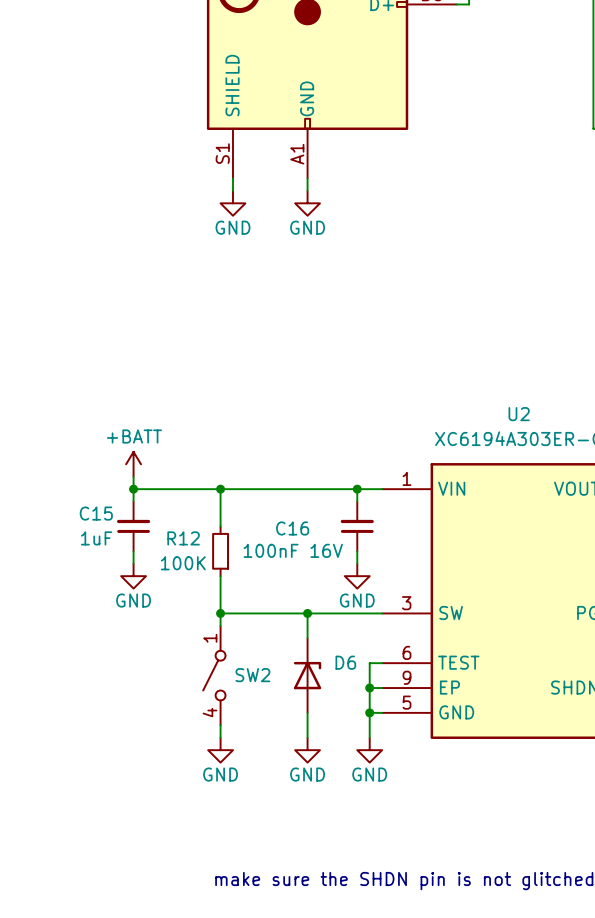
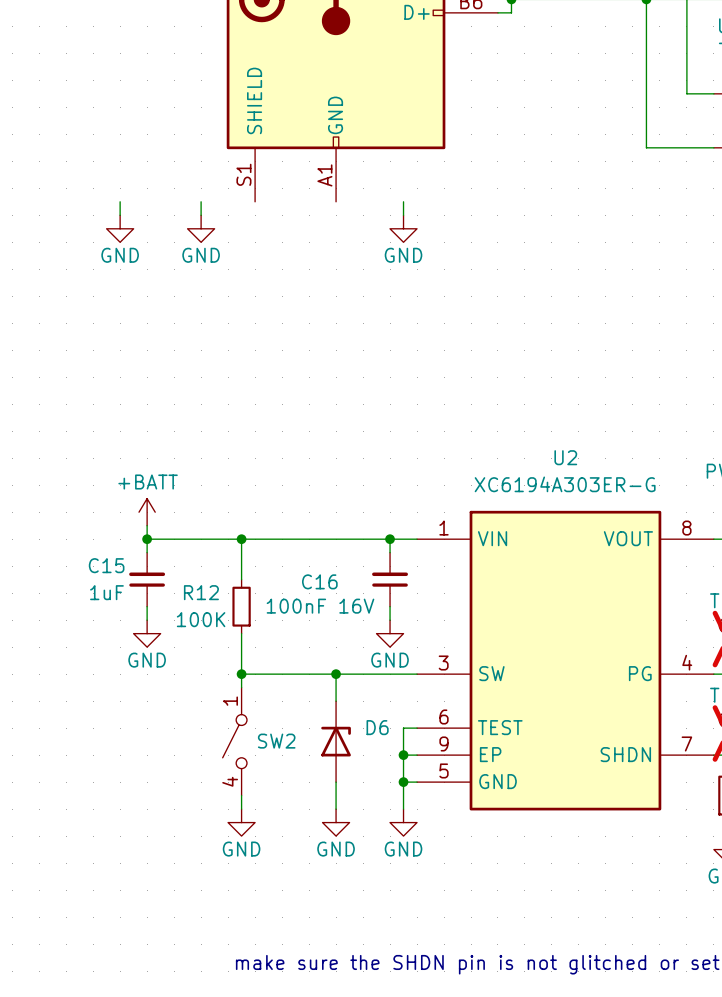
wire: (232, 178) (232, 190) -> (120, 201) (120, 215)
wire: (307, 178) (307, 190) -> (201, 201) (201, 215)
wire: none -> (403, 201) (403, 215)
power symbol: none -> GND (120, 228)
power symbol position: GND (232, 203) -> GND (201, 228)
power symbol: GND (307, 203) -> none
power symbol: none -> GND (403, 228)

